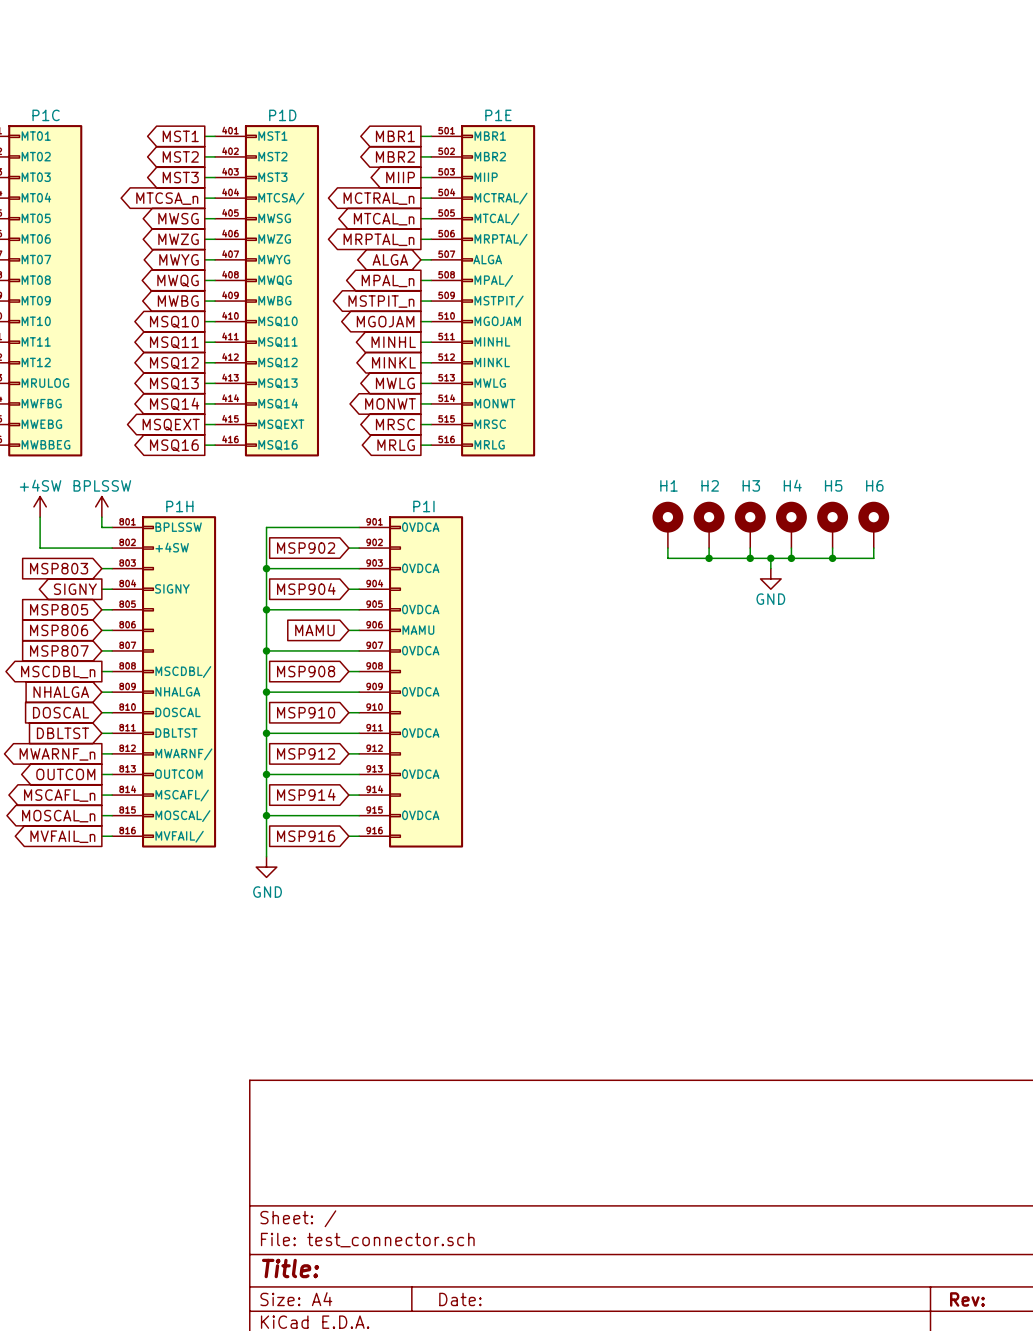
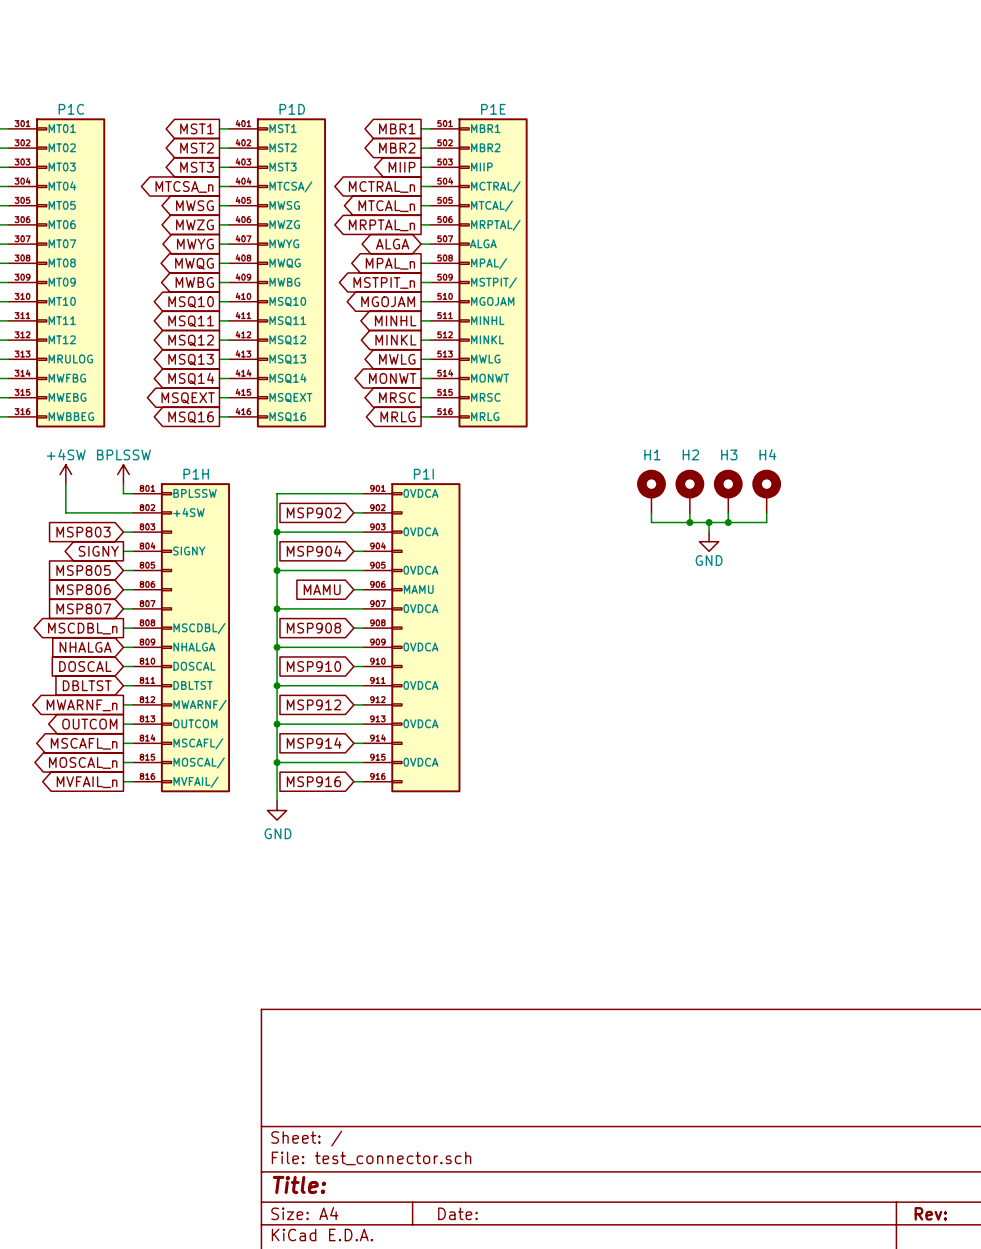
H5: (832, 524) -> none
H6: (873, 524) -> none
wire: (832, 548) (832, 558) -> none
wire: (873, 548) (873, 558) (791, 558) -> none
junction: none -> (709, 522)
wire: (770, 558) (770, 568) -> (709, 522) (709, 532)
junction: (770, 558) -> none
junction: (791, 558) -> none
junction: (832, 558) -> none
power symbol position: GND (770, 578) -> GND (709, 541)

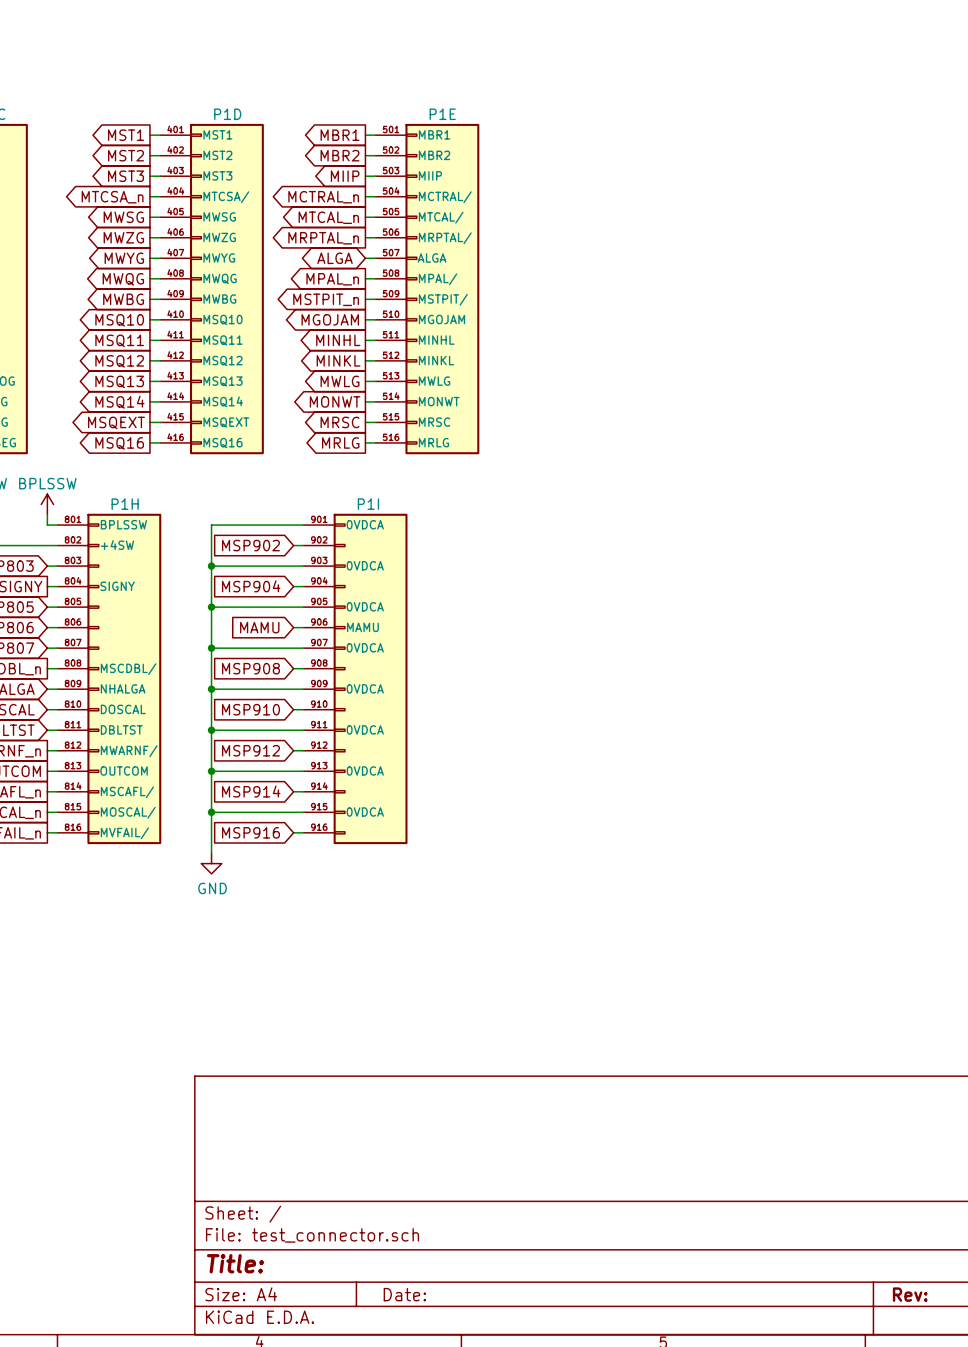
H1: (651, 491) -> none
H2: (689, 491) -> none
H3: (728, 491) -> none
H4: (766, 491) -> none
wire: (651, 512) (651, 522) (766, 522) (766, 512) -> none
wire: (689, 512) (689, 522) -> none
wire: (728, 512) (728, 522) -> none
junction: (689, 522) -> none
wire: (709, 522) (709, 532) -> none
junction: (709, 522) -> none
junction: (728, 522) -> none
power symbol: GND (709, 541) -> none

